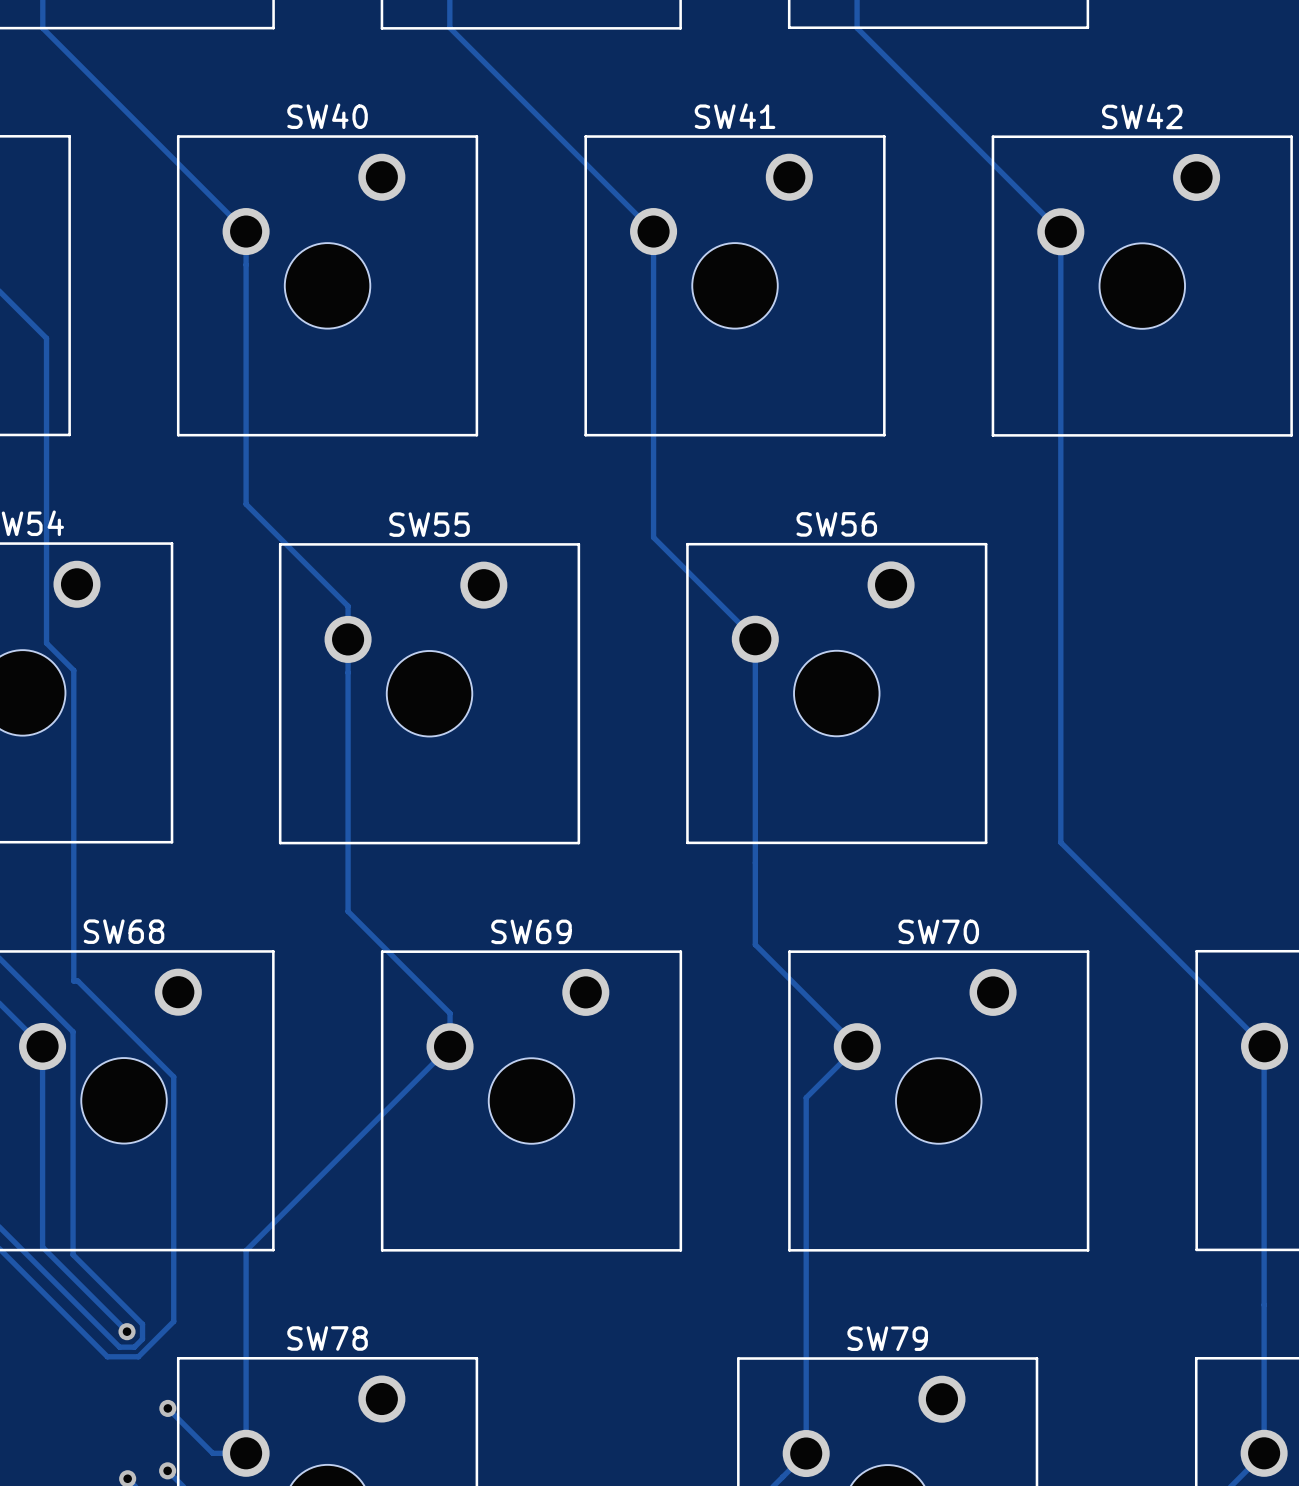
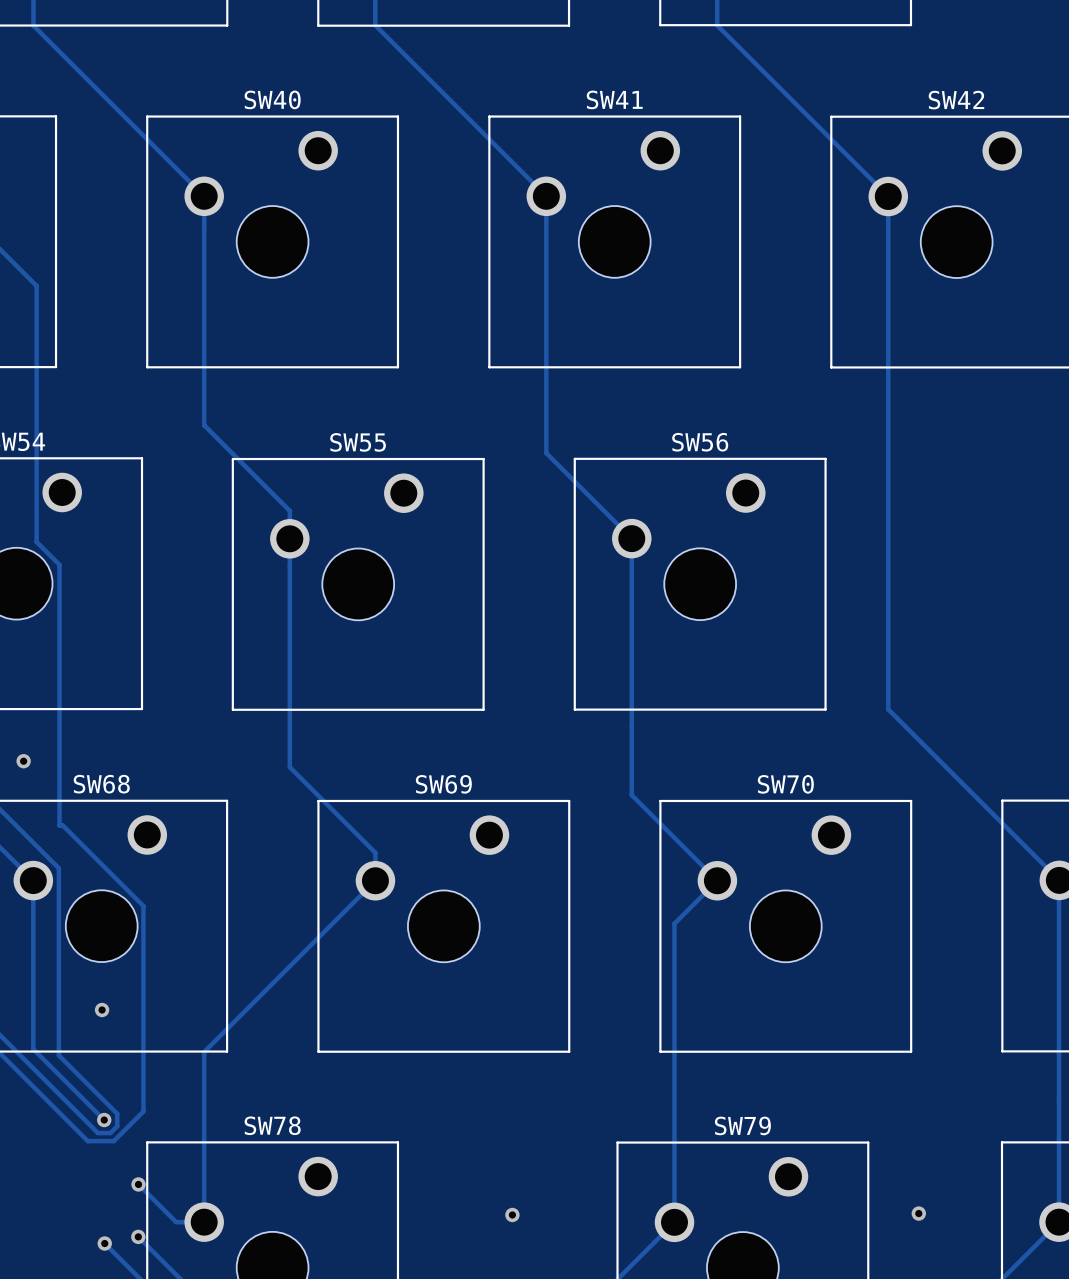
via: none -> (23, 761)
via: none -> (102, 1009)
via: none -> (918, 1213)
via: none -> (512, 1214)

